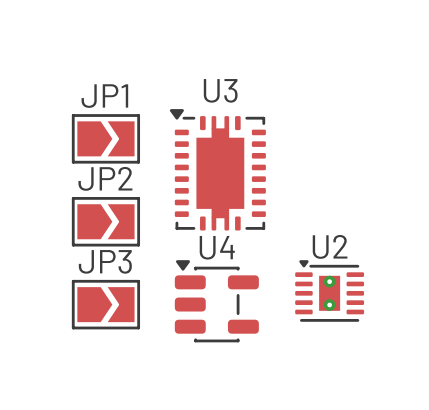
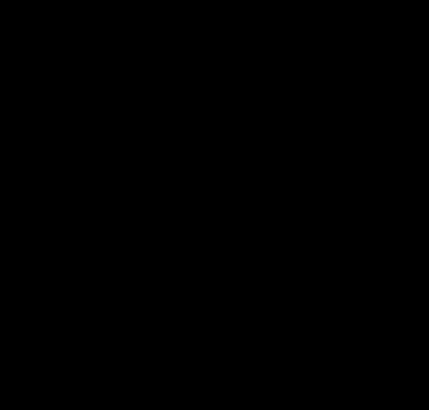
JP1: (105, 138) -> none
U3: (217, 169) -> none
JP2: (105, 221) -> none
U2: (329, 290) -> none
U4: (216, 301) -> none
JP3: (105, 304) -> none

